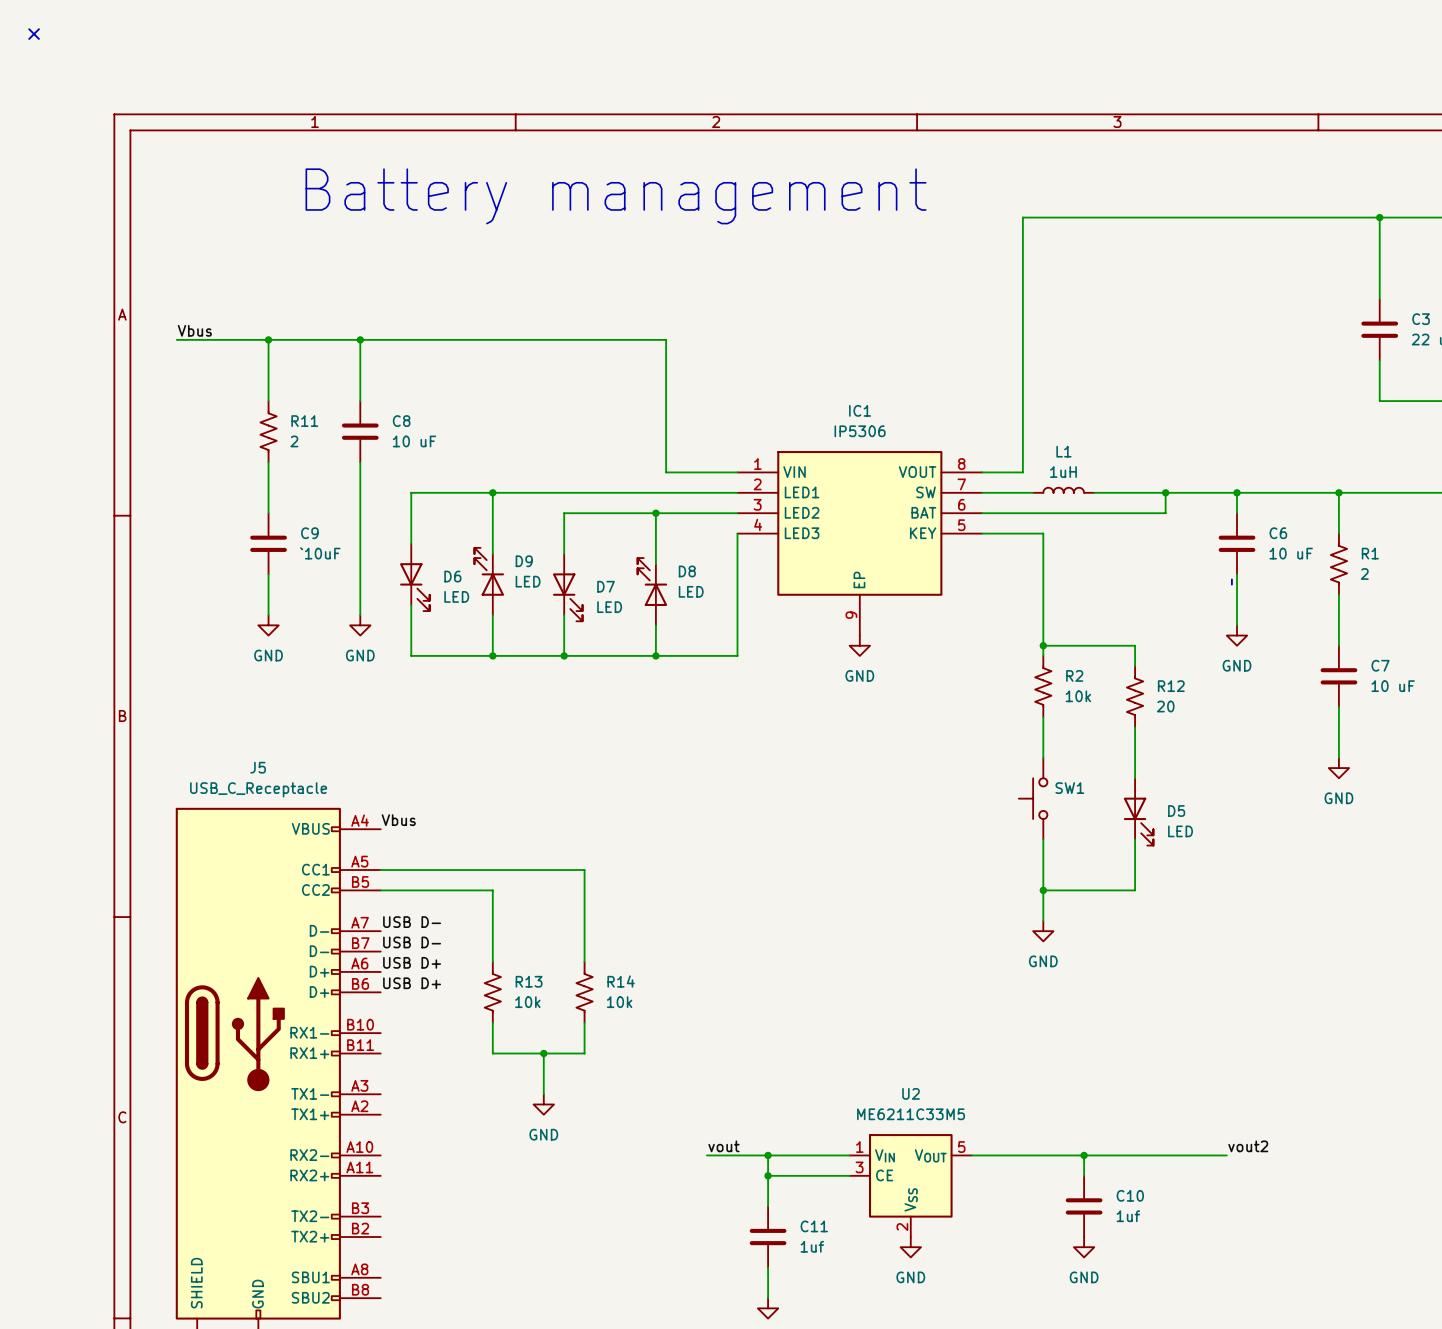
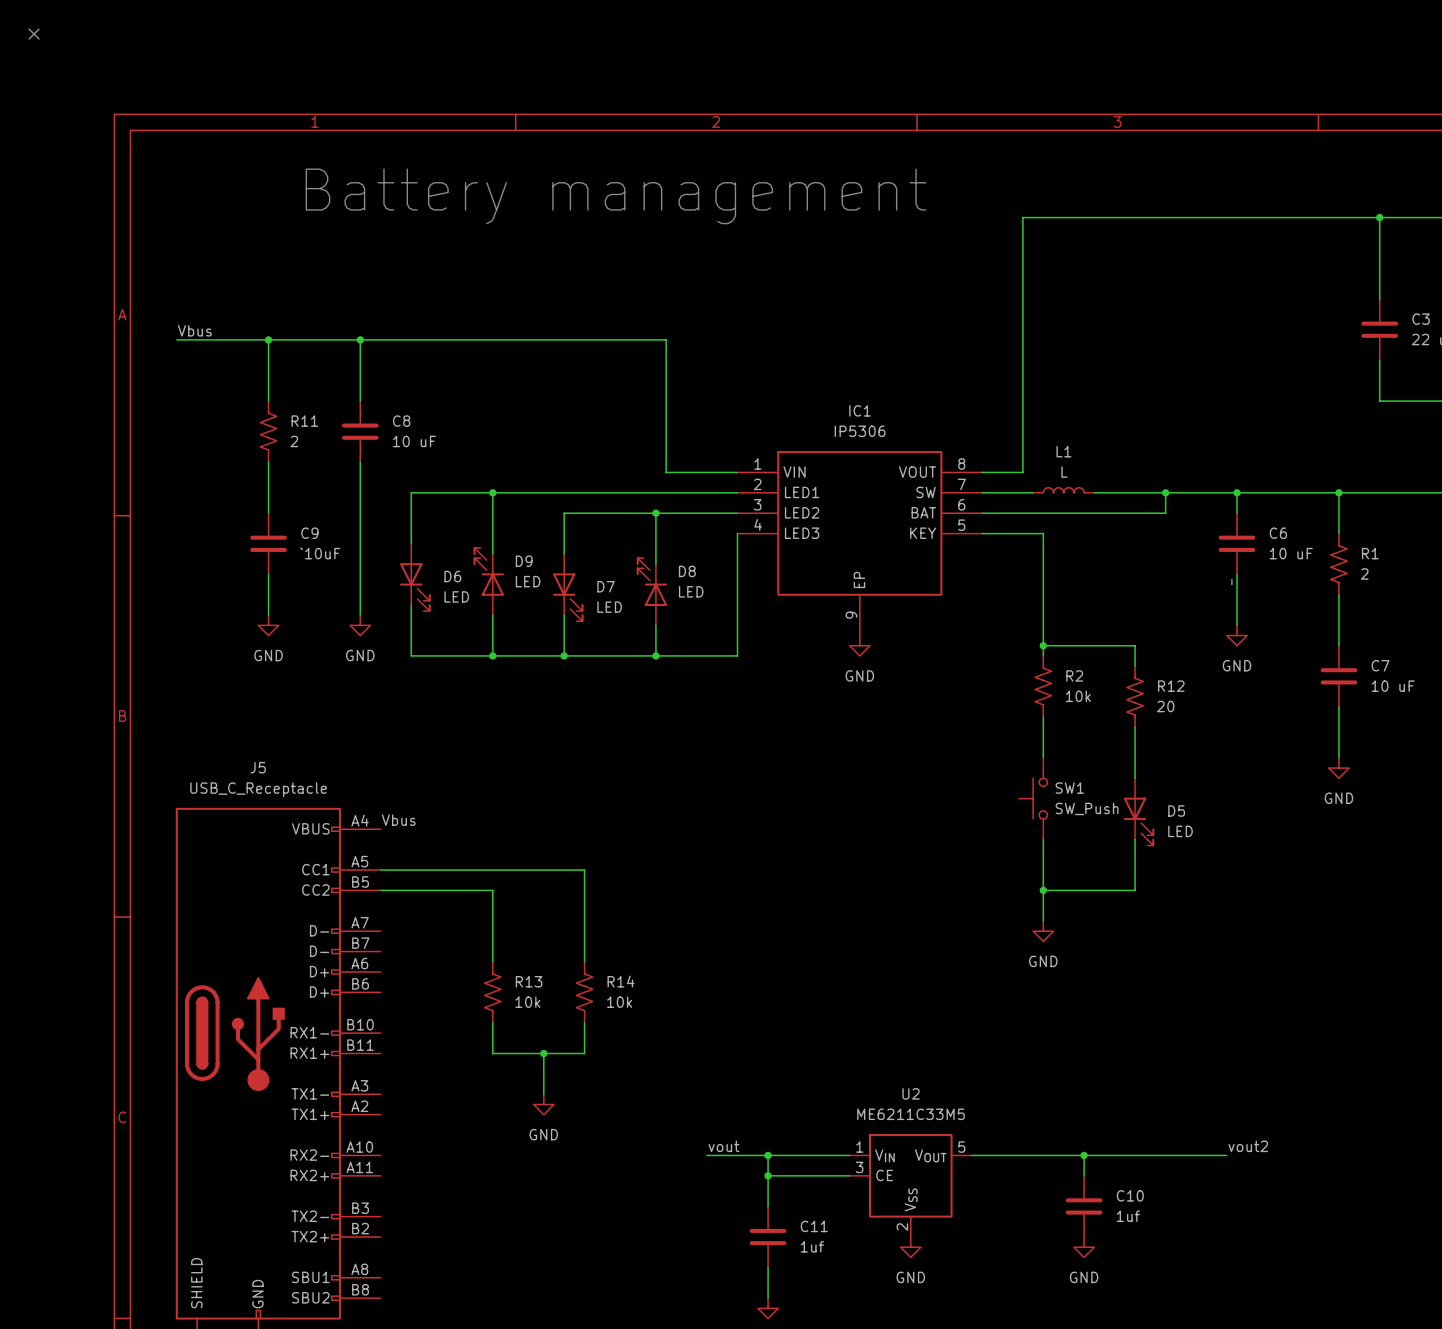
L1 value: 1uH (1063, 472) -> L (1064, 472)
SW1 value: none -> SW_Push (1087, 808)
label: USB D- (412, 922) -> none
label: USB D- (412, 942) -> none
label: USB D+ (412, 962) -> none
label: USB D+ (412, 983) -> none

